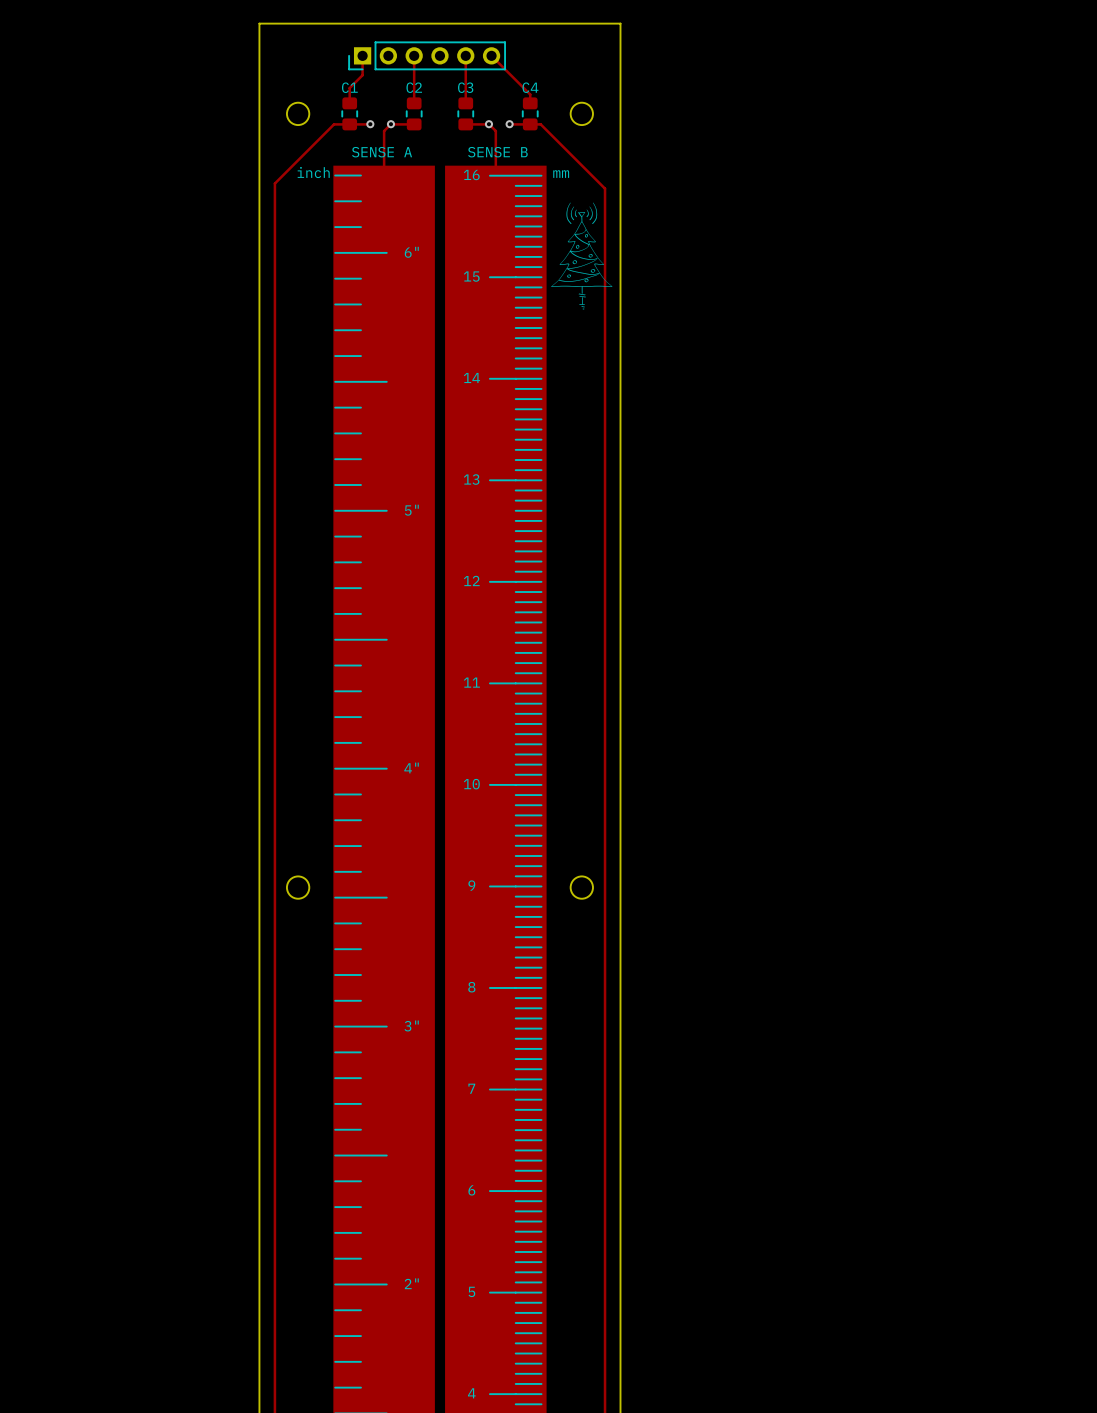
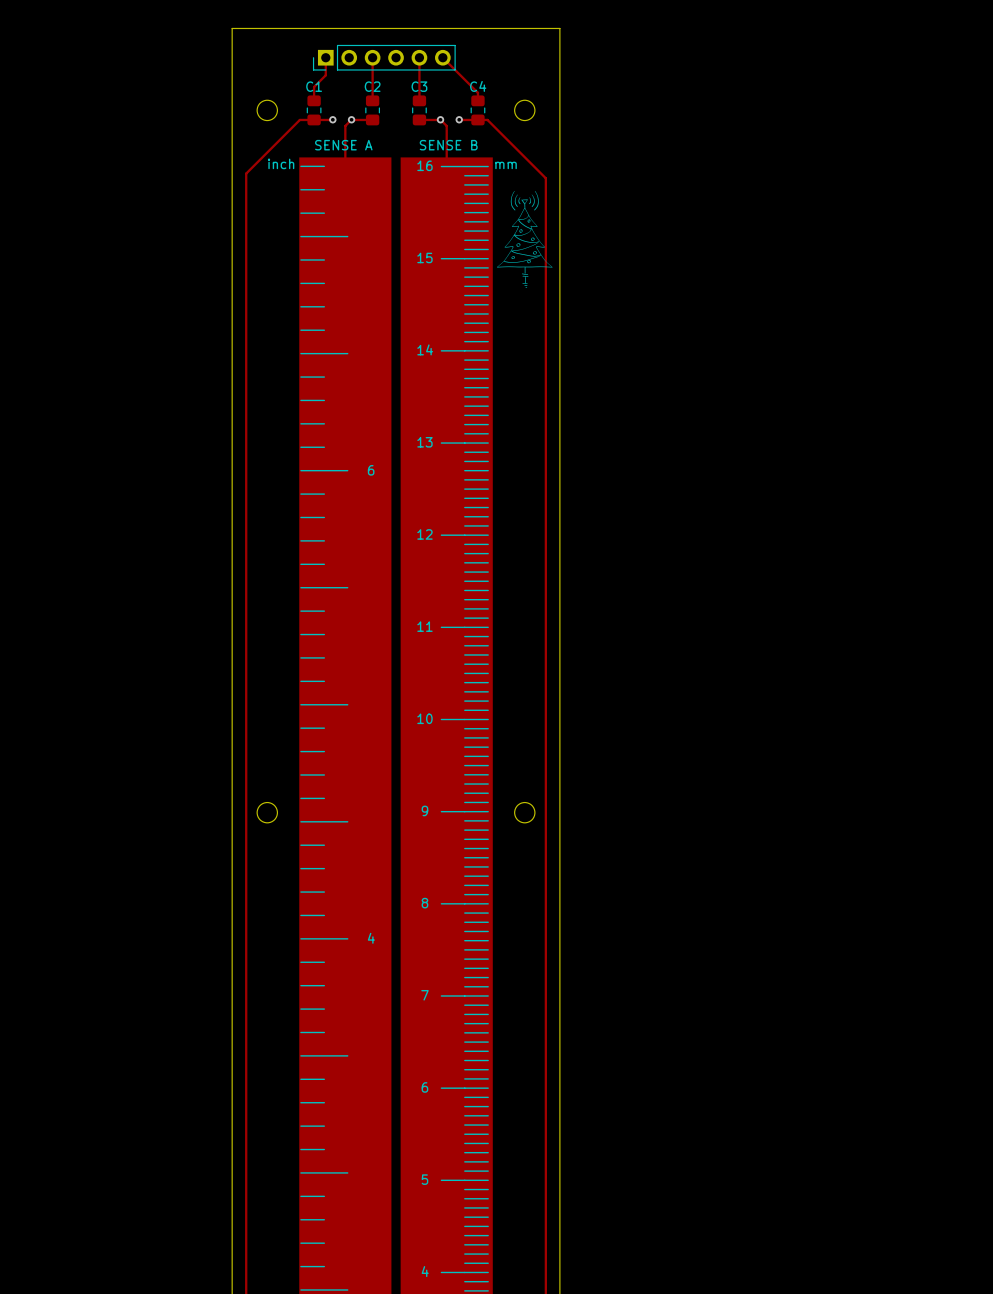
text: 6" (411, 252) -> none
text: 5" (411, 510) -> 6 (371, 470)
text: 4" (411, 767) -> none
text: 3" (411, 1025) -> 4 (371, 938)
text: 2" (411, 1283) -> none

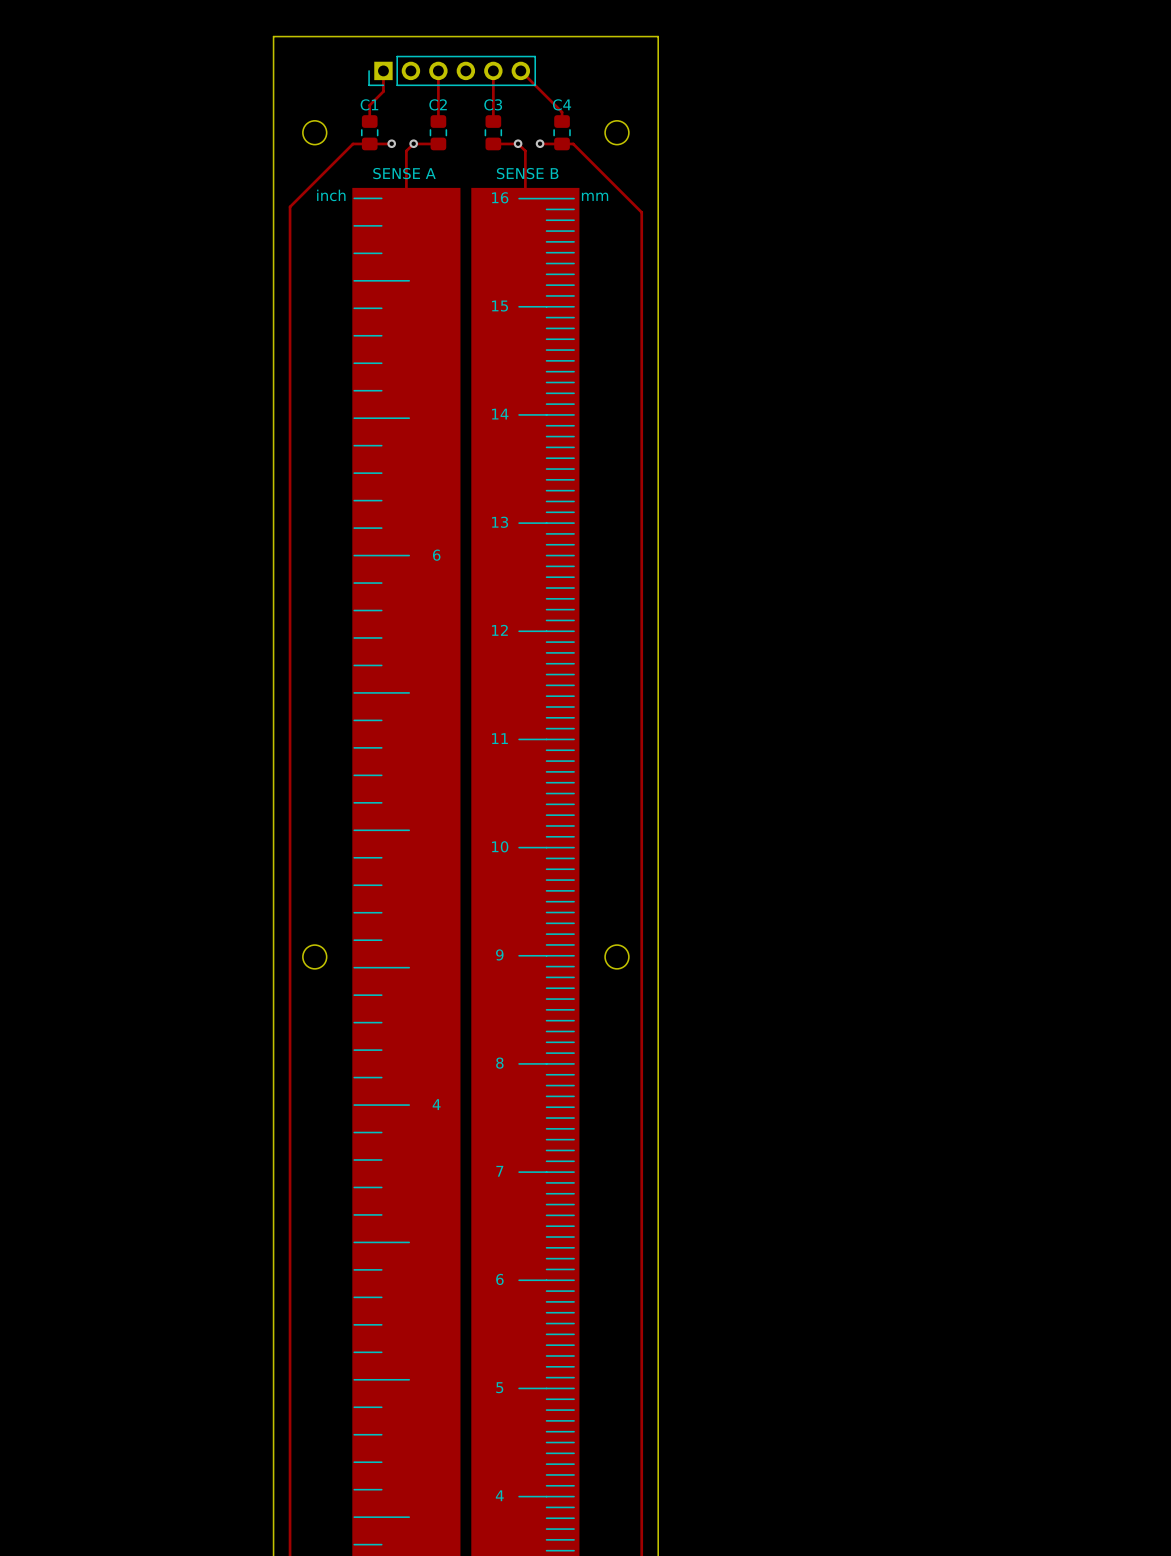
drawing: [497, 190, 553, 288] -> none

